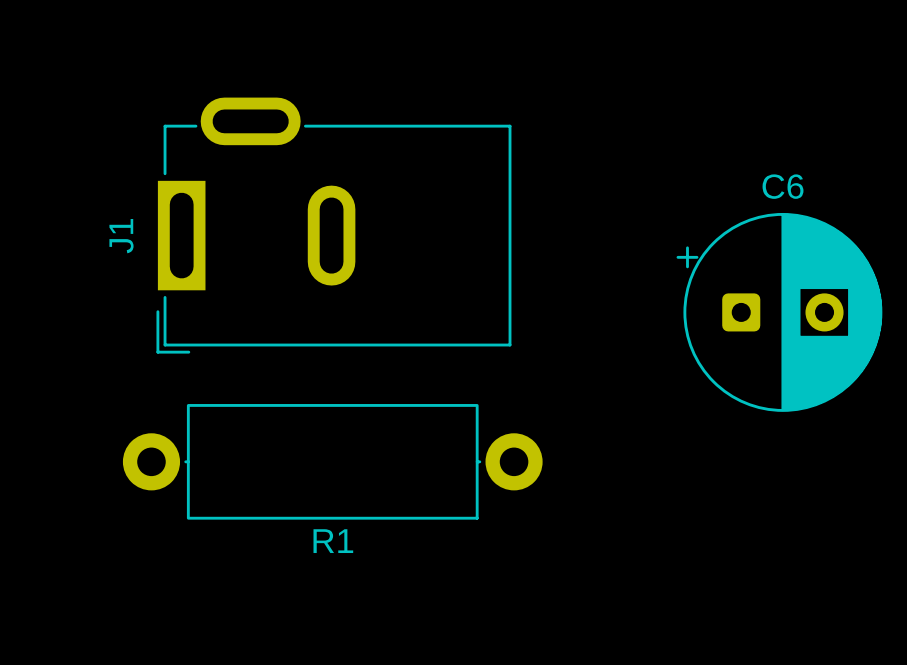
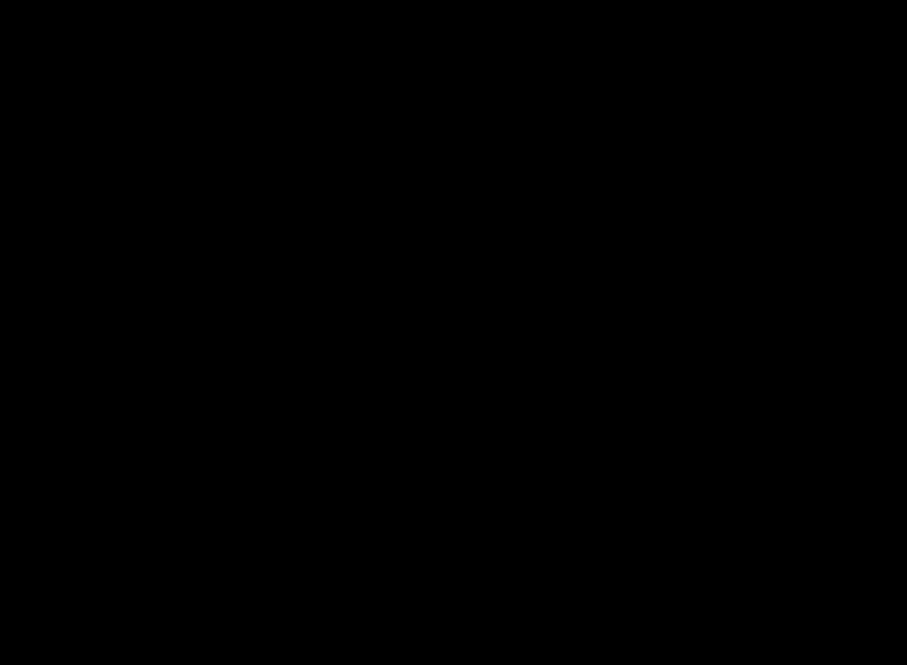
J1: (333, 225) -> none
C6: (779, 312) -> none
R1: (332, 461) -> none

